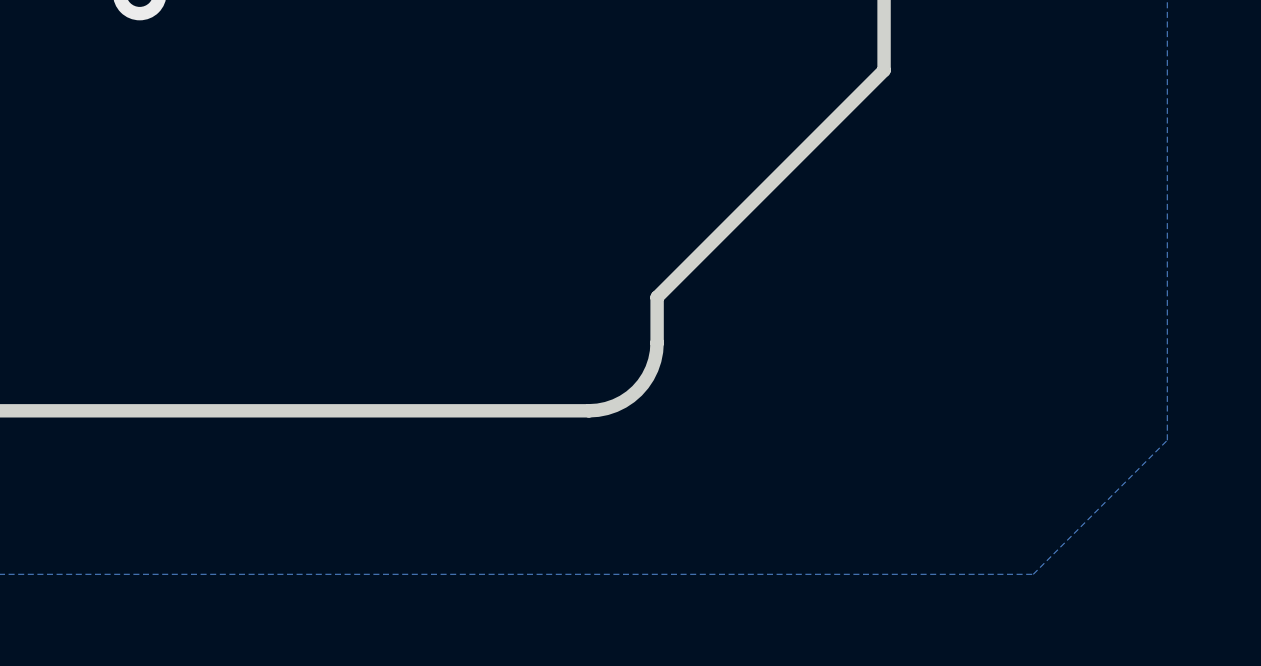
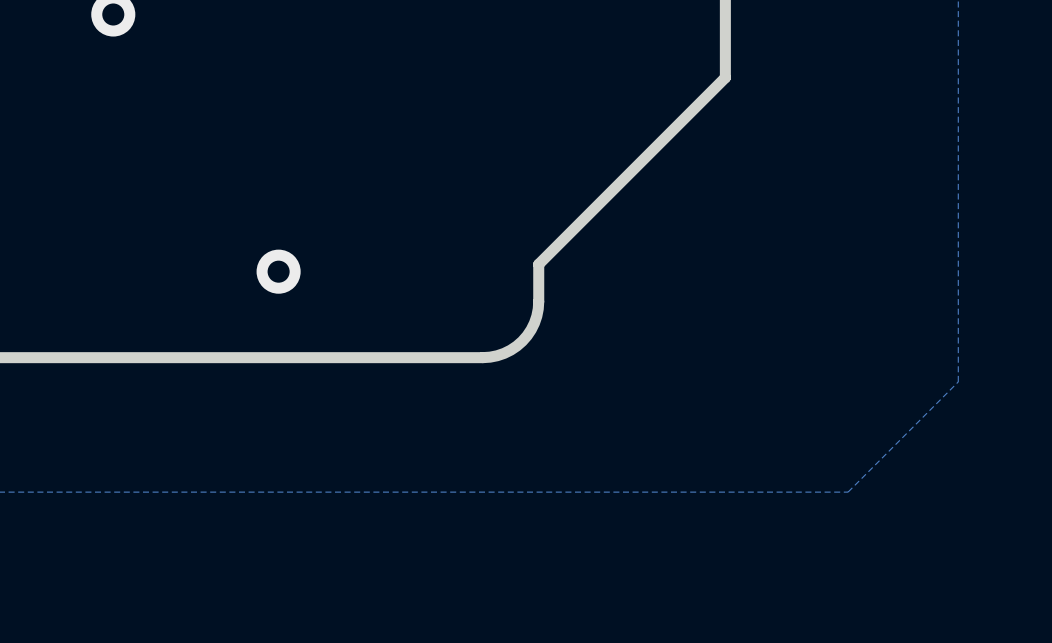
via: none -> (278, 271)

